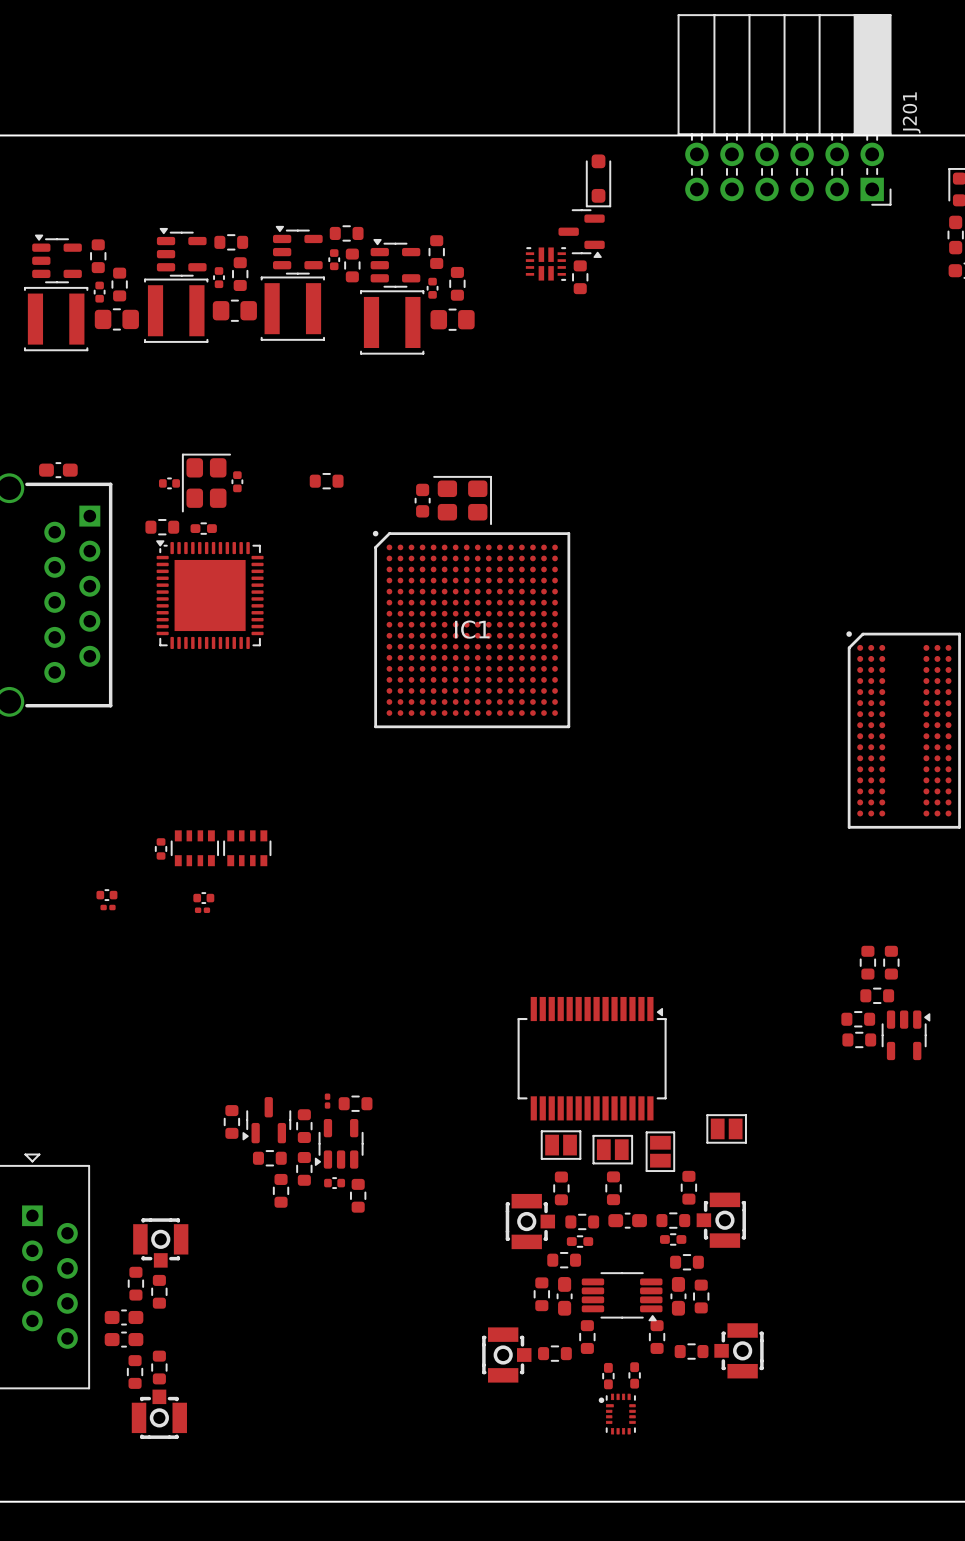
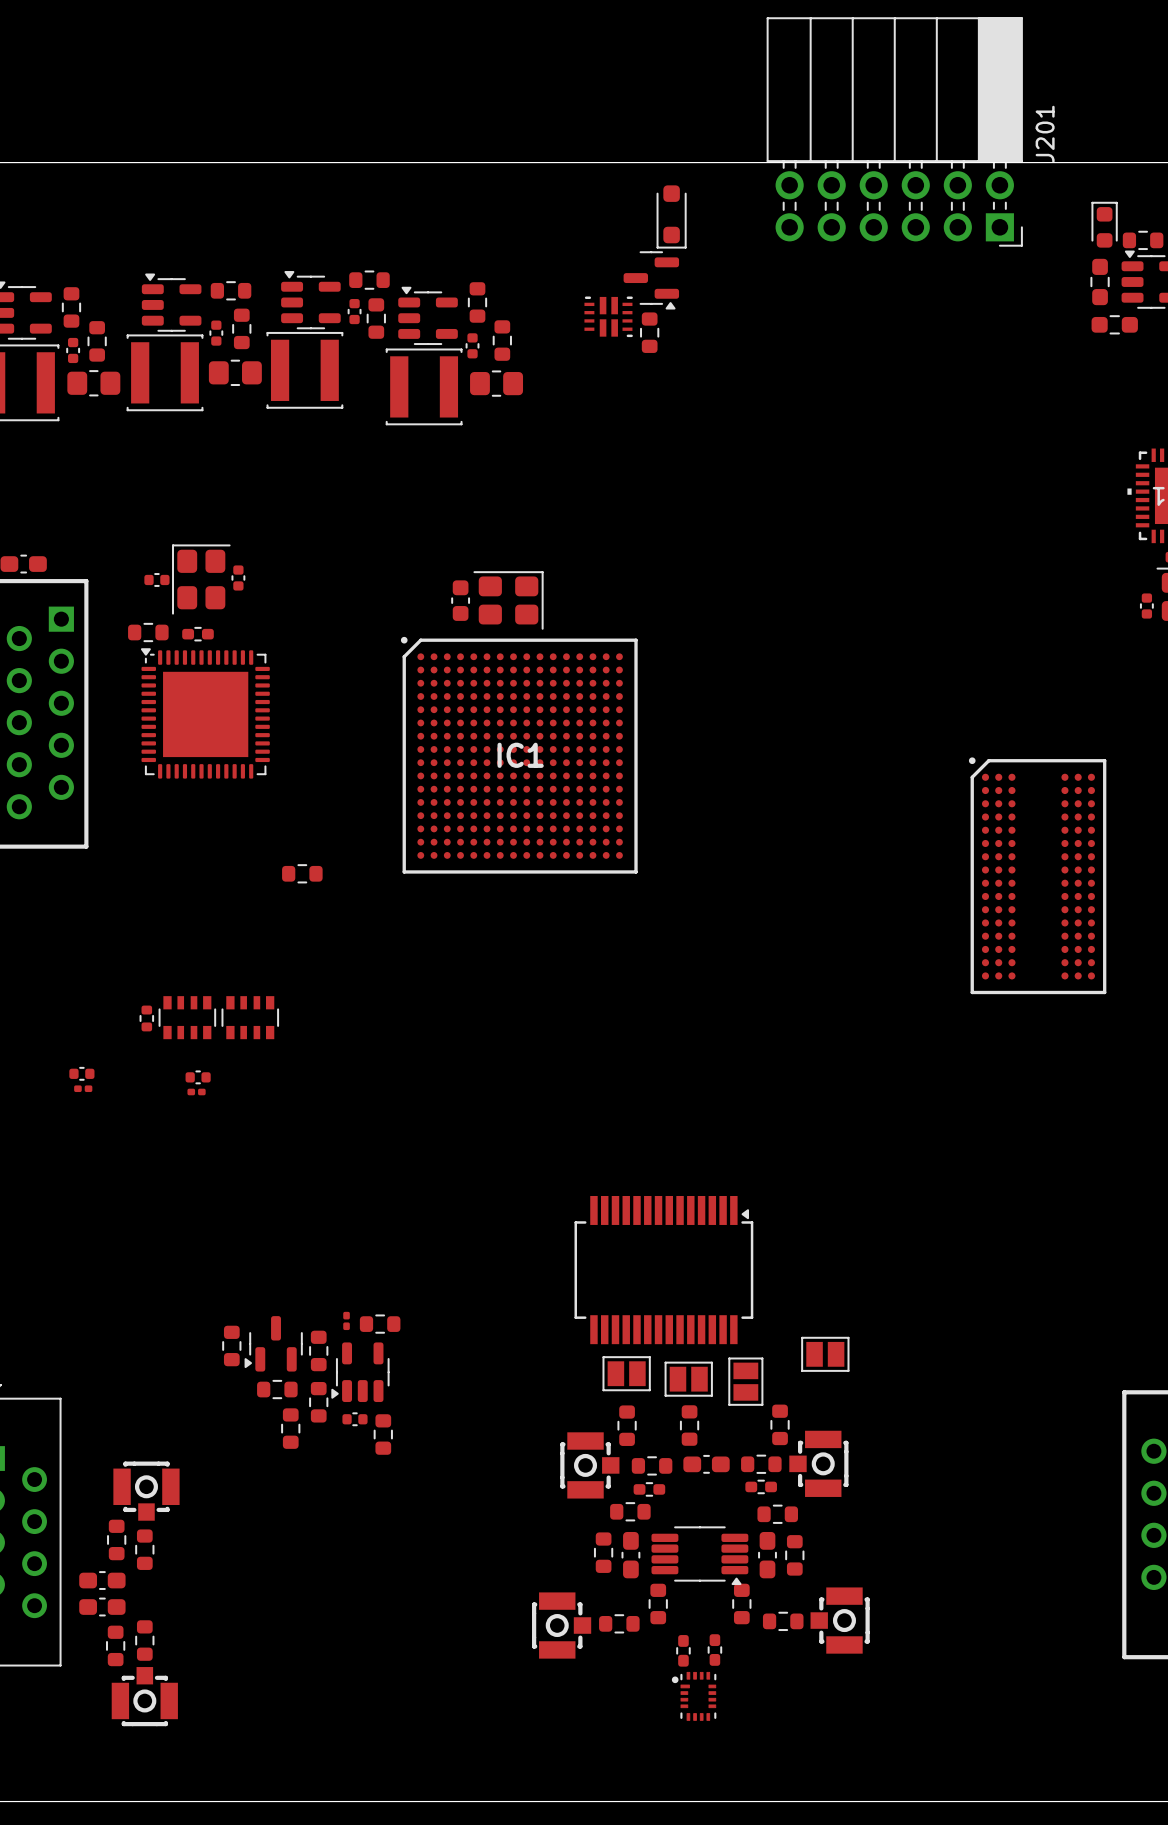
part position: (326, 481) -> (302, 873)
part: (867, 962) -> none
part: (891, 962) -> none
part: (877, 995) -> none
part: (858, 1019) -> none
part: (906, 1035) -> none
part: (859, 1039) -> none

